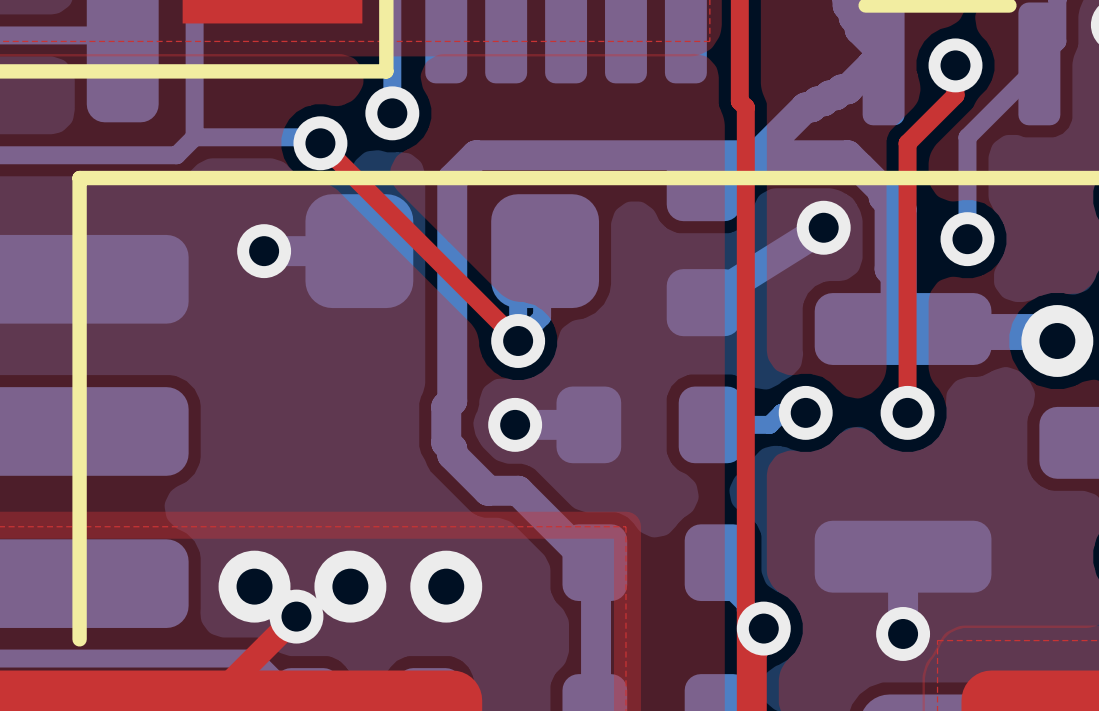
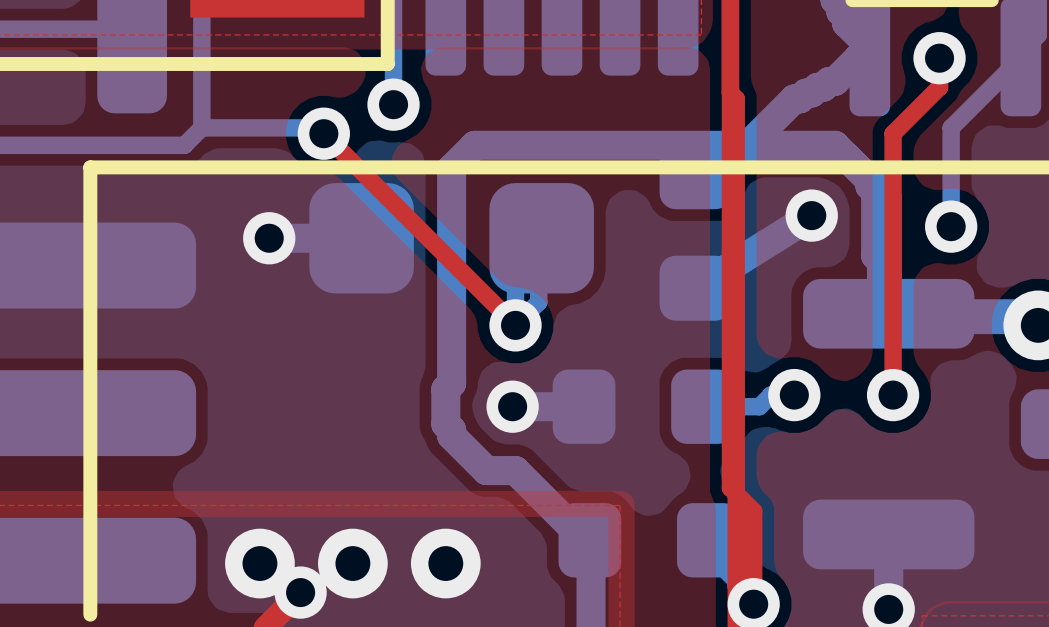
top track: none -> (730, 93) (730, 488) (753, 511) (753, 604)

